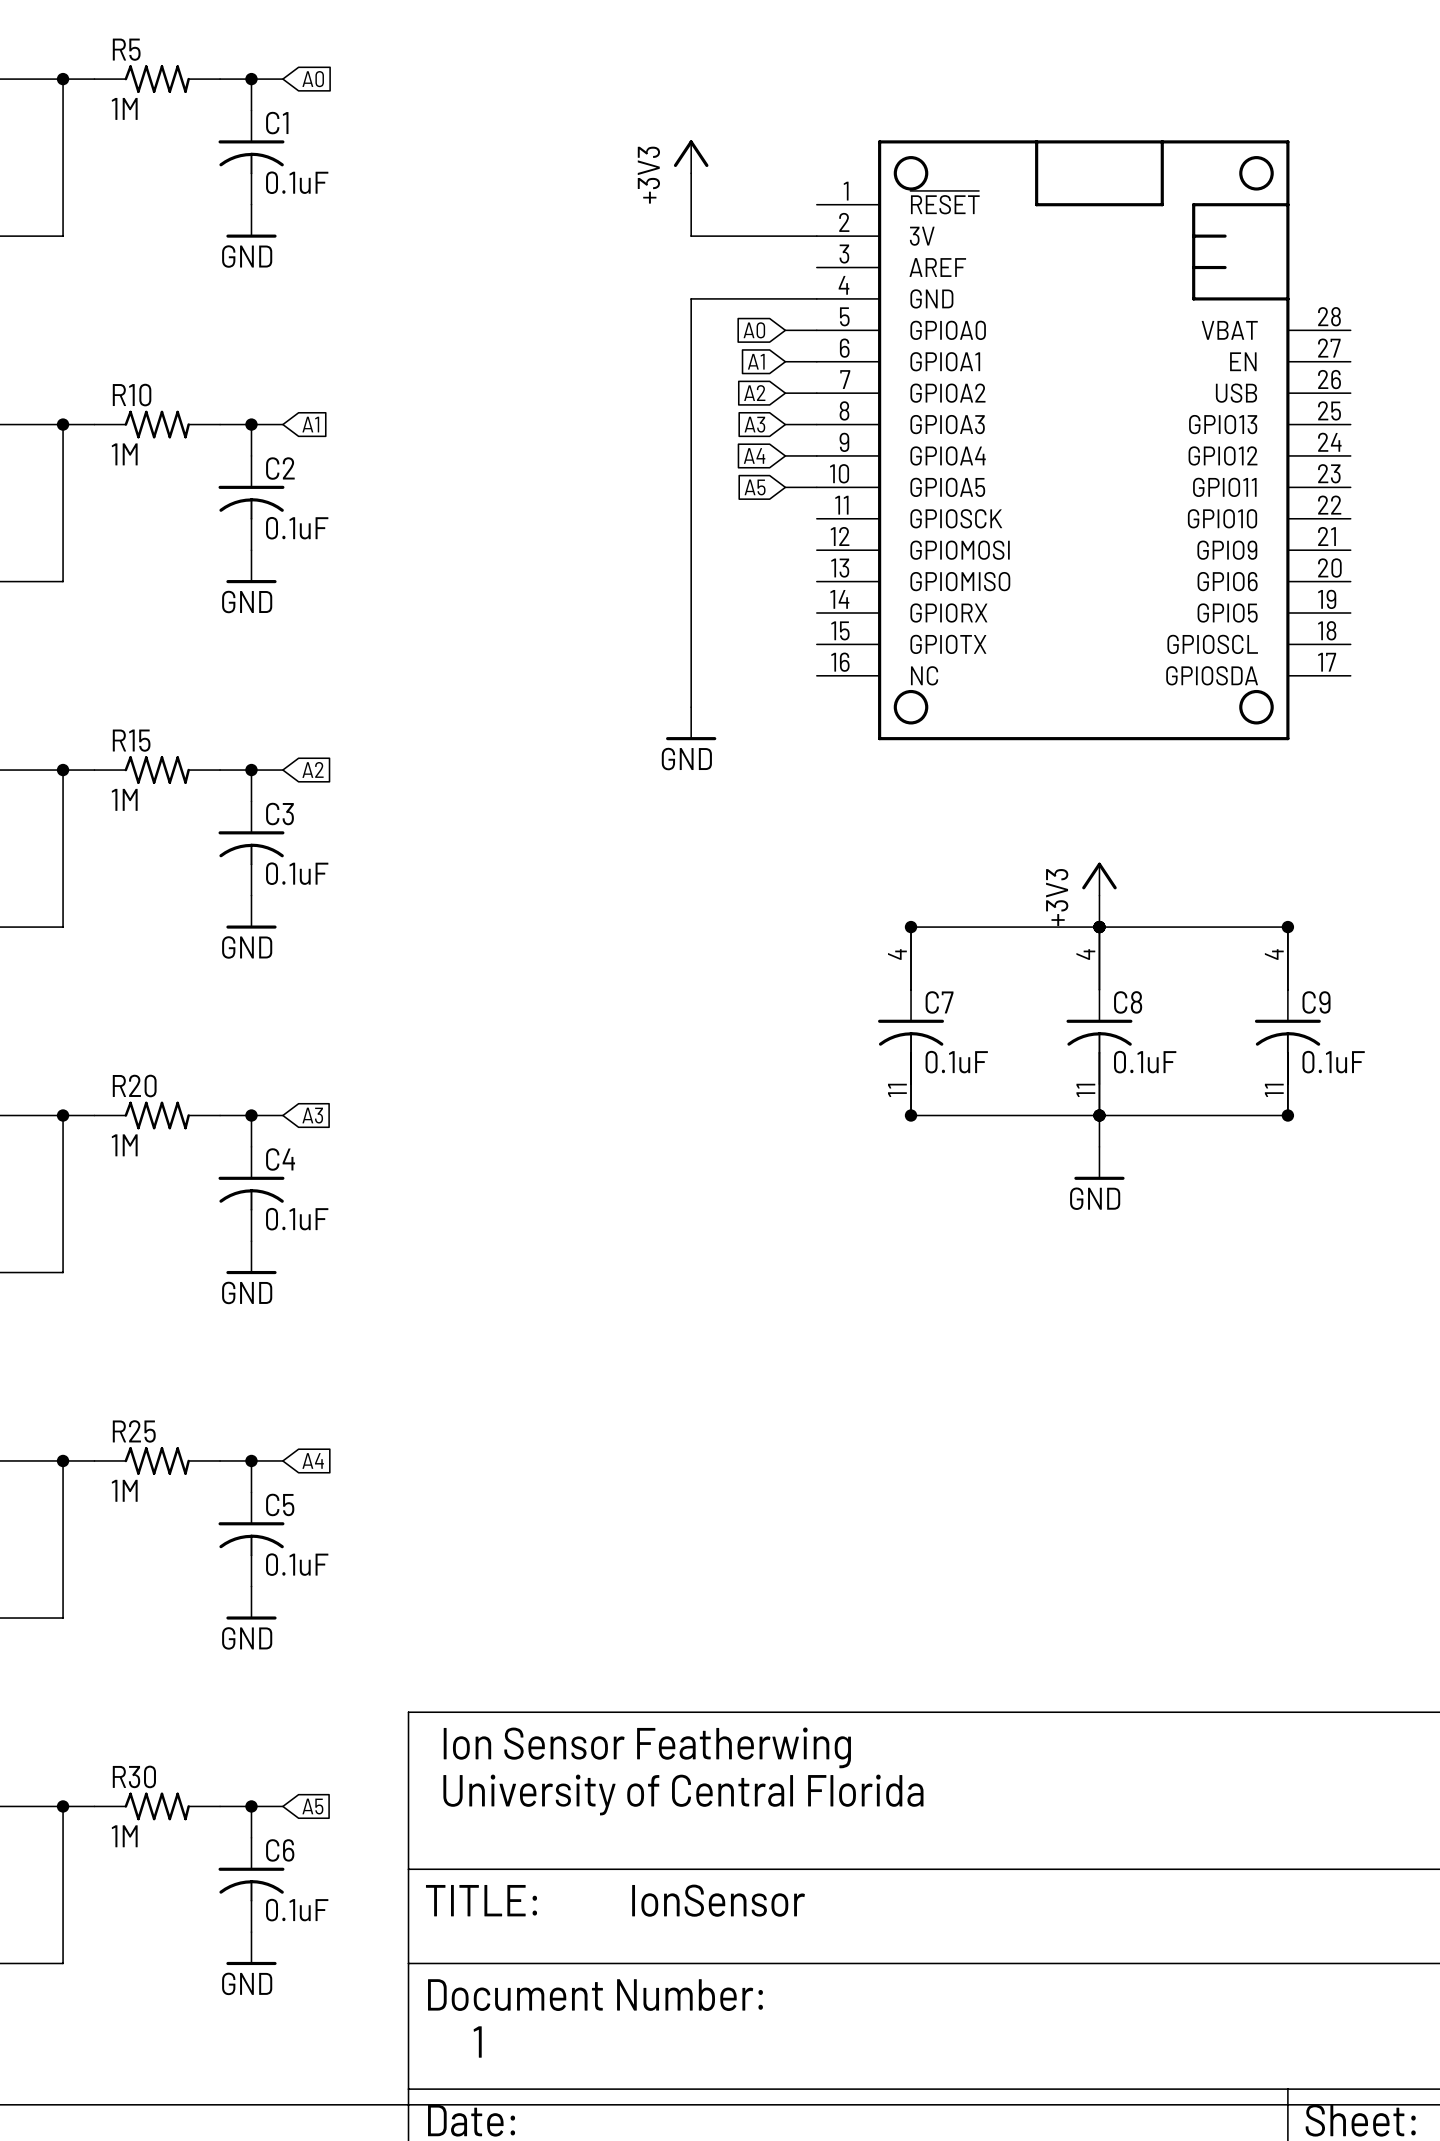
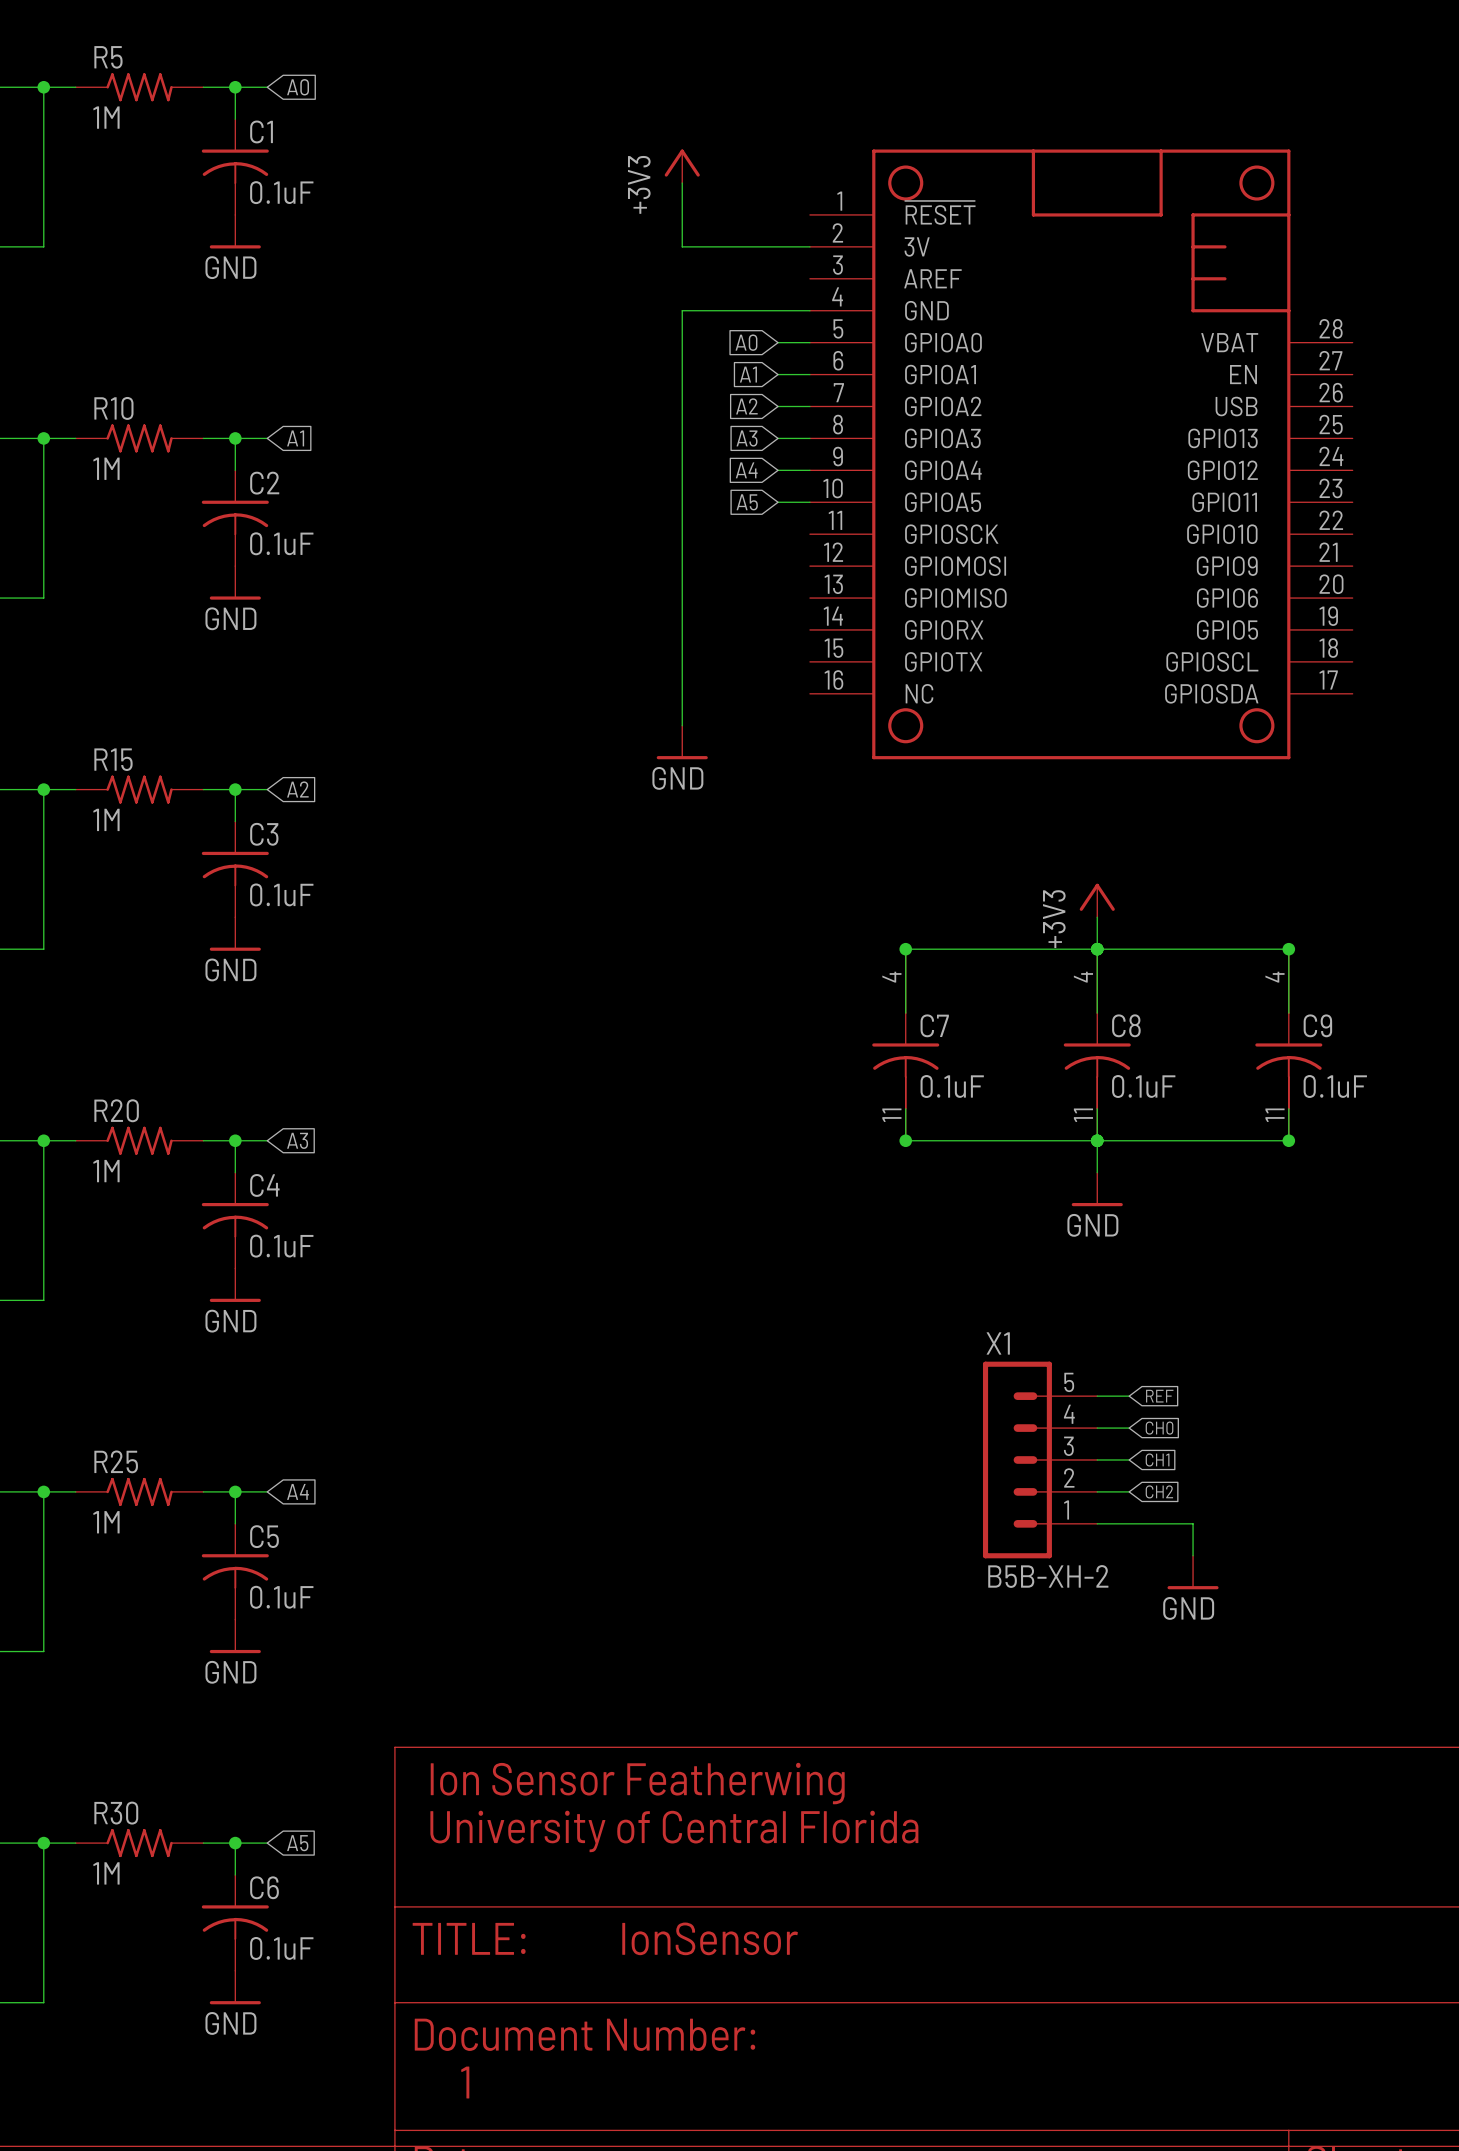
wire: none -> (1097, 1396) (1129, 1396)
global label: none -> REF (1159, 1396)
wire: none -> (1097, 1428) (1129, 1428)
global label: none -> CH0 (1159, 1428)
X1: none -> B5B-XH-2 (1040, 1459)
wire: none -> (1097, 1459) (1129, 1459)
global label: none -> CH1 (1157, 1460)
wire: none -> (1097, 1491) (1129, 1491)
global label: none -> CH2 (1159, 1491)
wire: none -> (1097, 1523) (1193, 1523) (1193, 1555)
power symbol: none -> GND (1193, 1572)

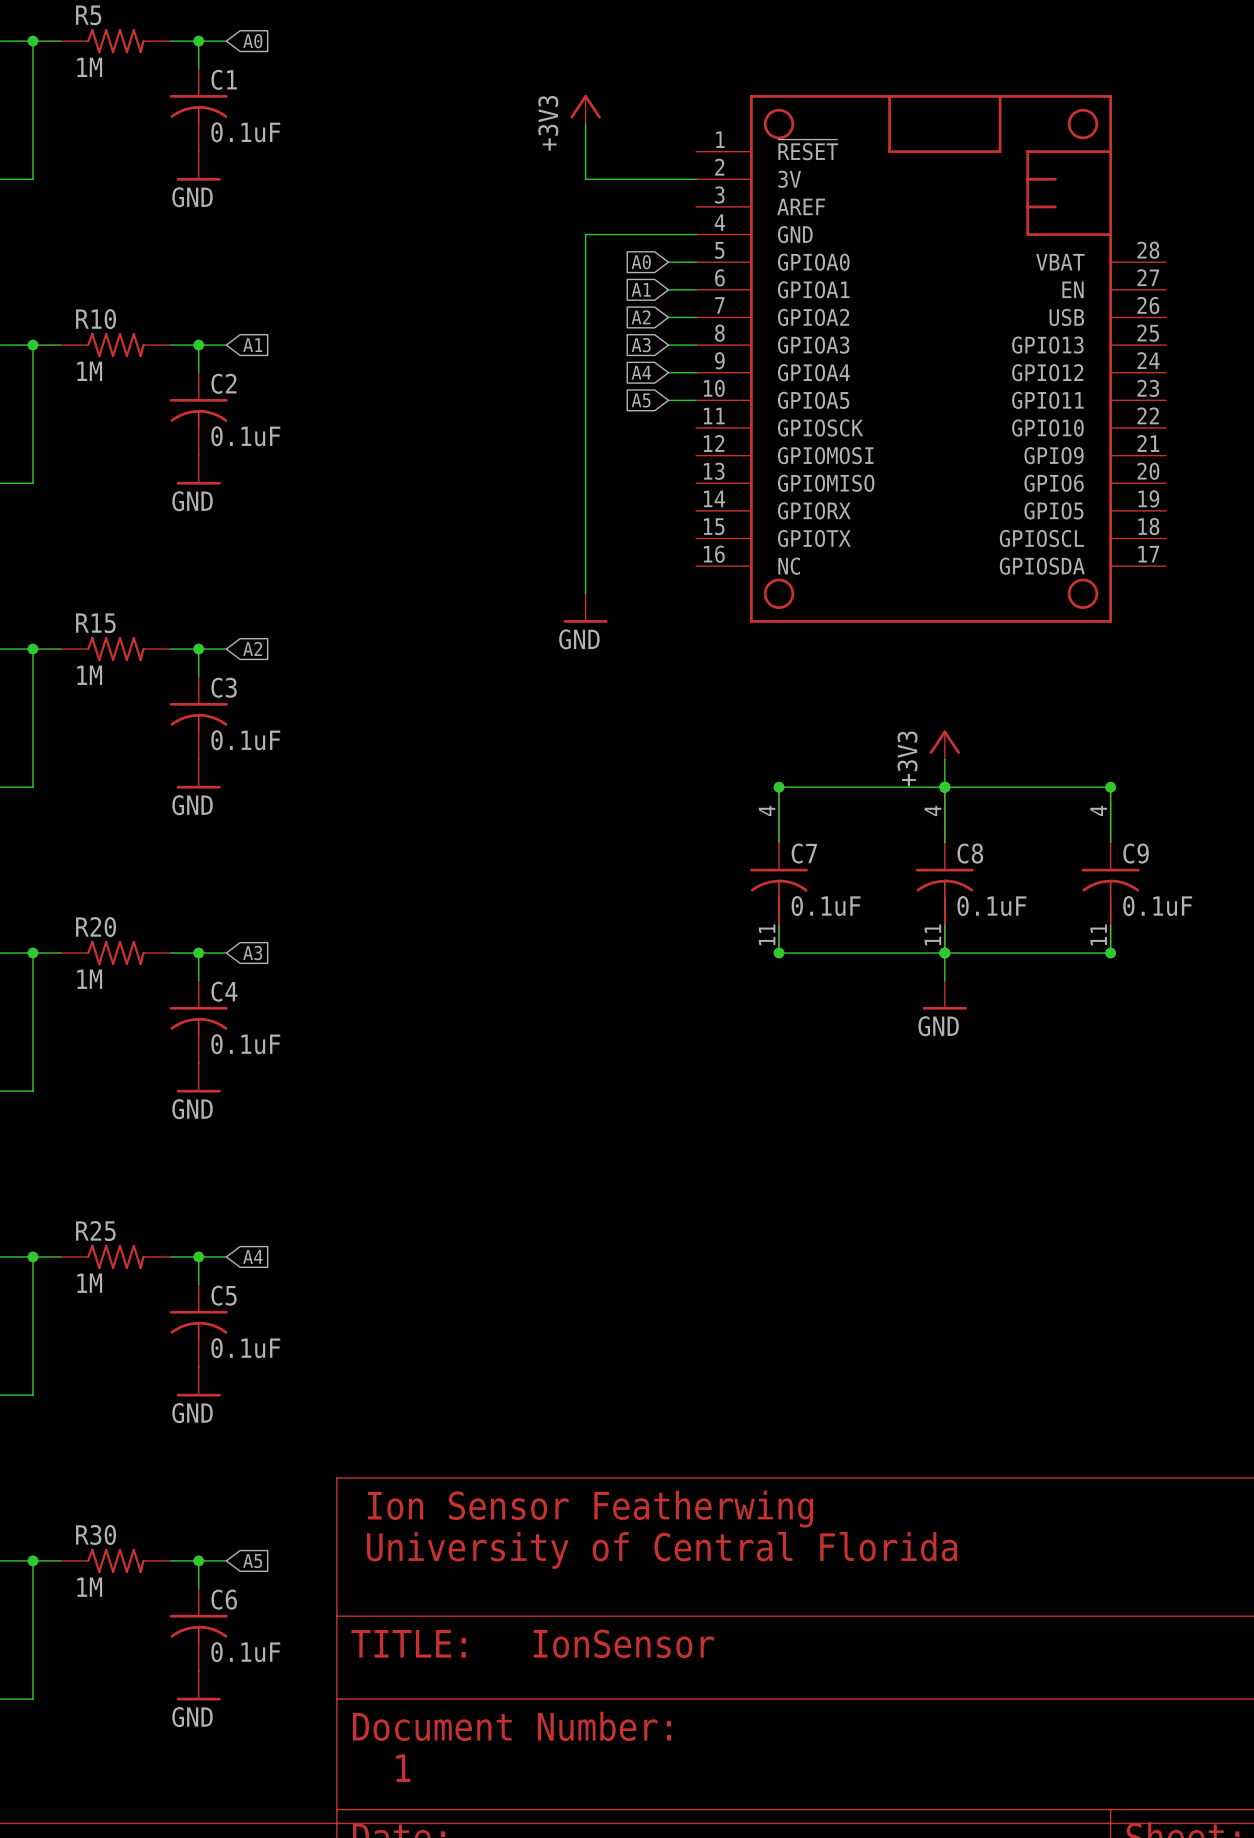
wire: (1097, 1396) (1129, 1396) -> none
global label: REF (1159, 1396) -> none
wire: (1097, 1428) (1129, 1428) -> none
global label: CH0 (1159, 1428) -> none
X1: B5B-XH-2 (1040, 1459) -> none
wire: (1097, 1459) (1129, 1459) -> none
global label: CH1 (1157, 1460) -> none
wire: (1097, 1491) (1129, 1491) -> none
global label: CH2 (1159, 1491) -> none
wire: (1097, 1523) (1193, 1523) (1193, 1555) -> none
power symbol: GND (1193, 1572) -> none

